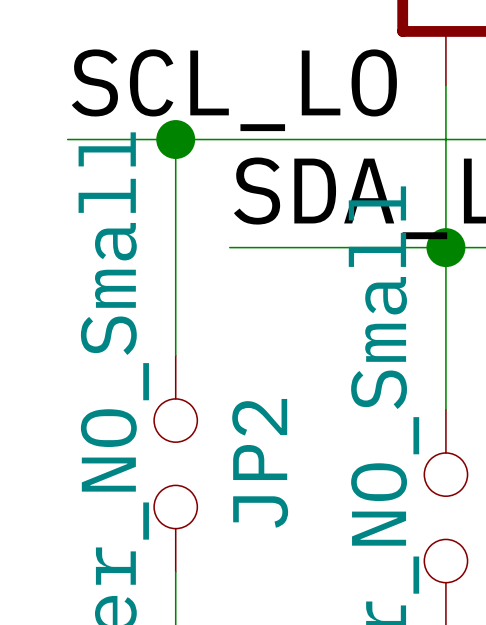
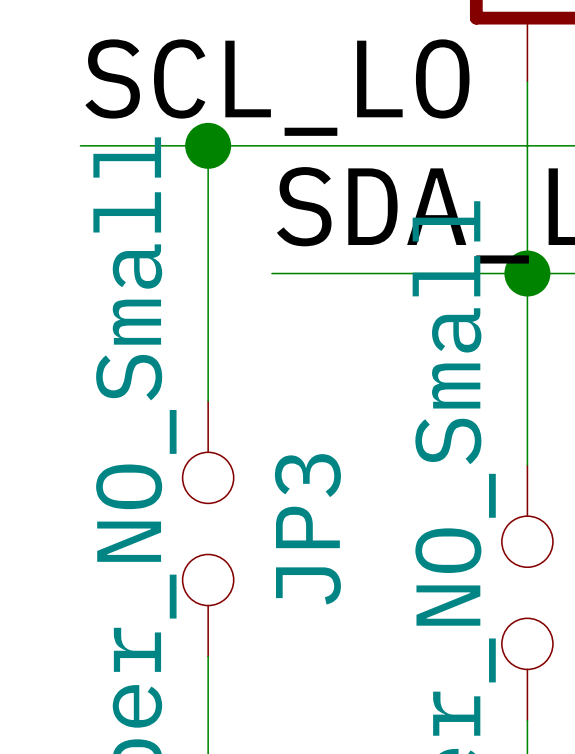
JP2 name: JP2 (260, 463) -> JP3 (307, 529)

